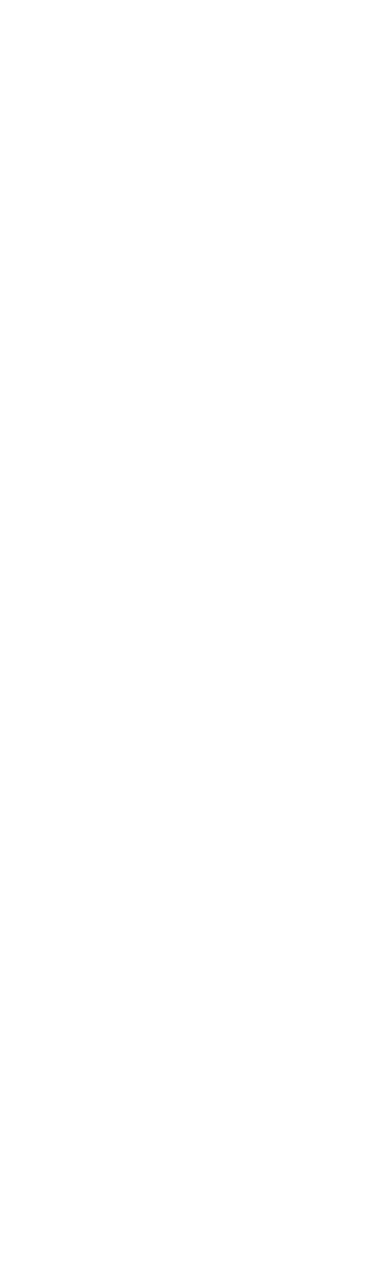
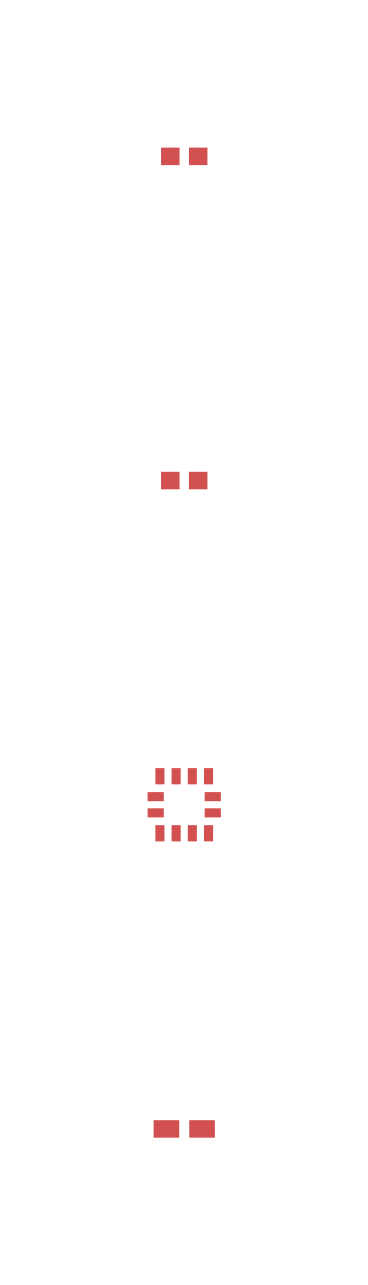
part: none -> (184, 156)
part: none -> (184, 480)
part: none -> (184, 804)
part: none -> (184, 1128)

